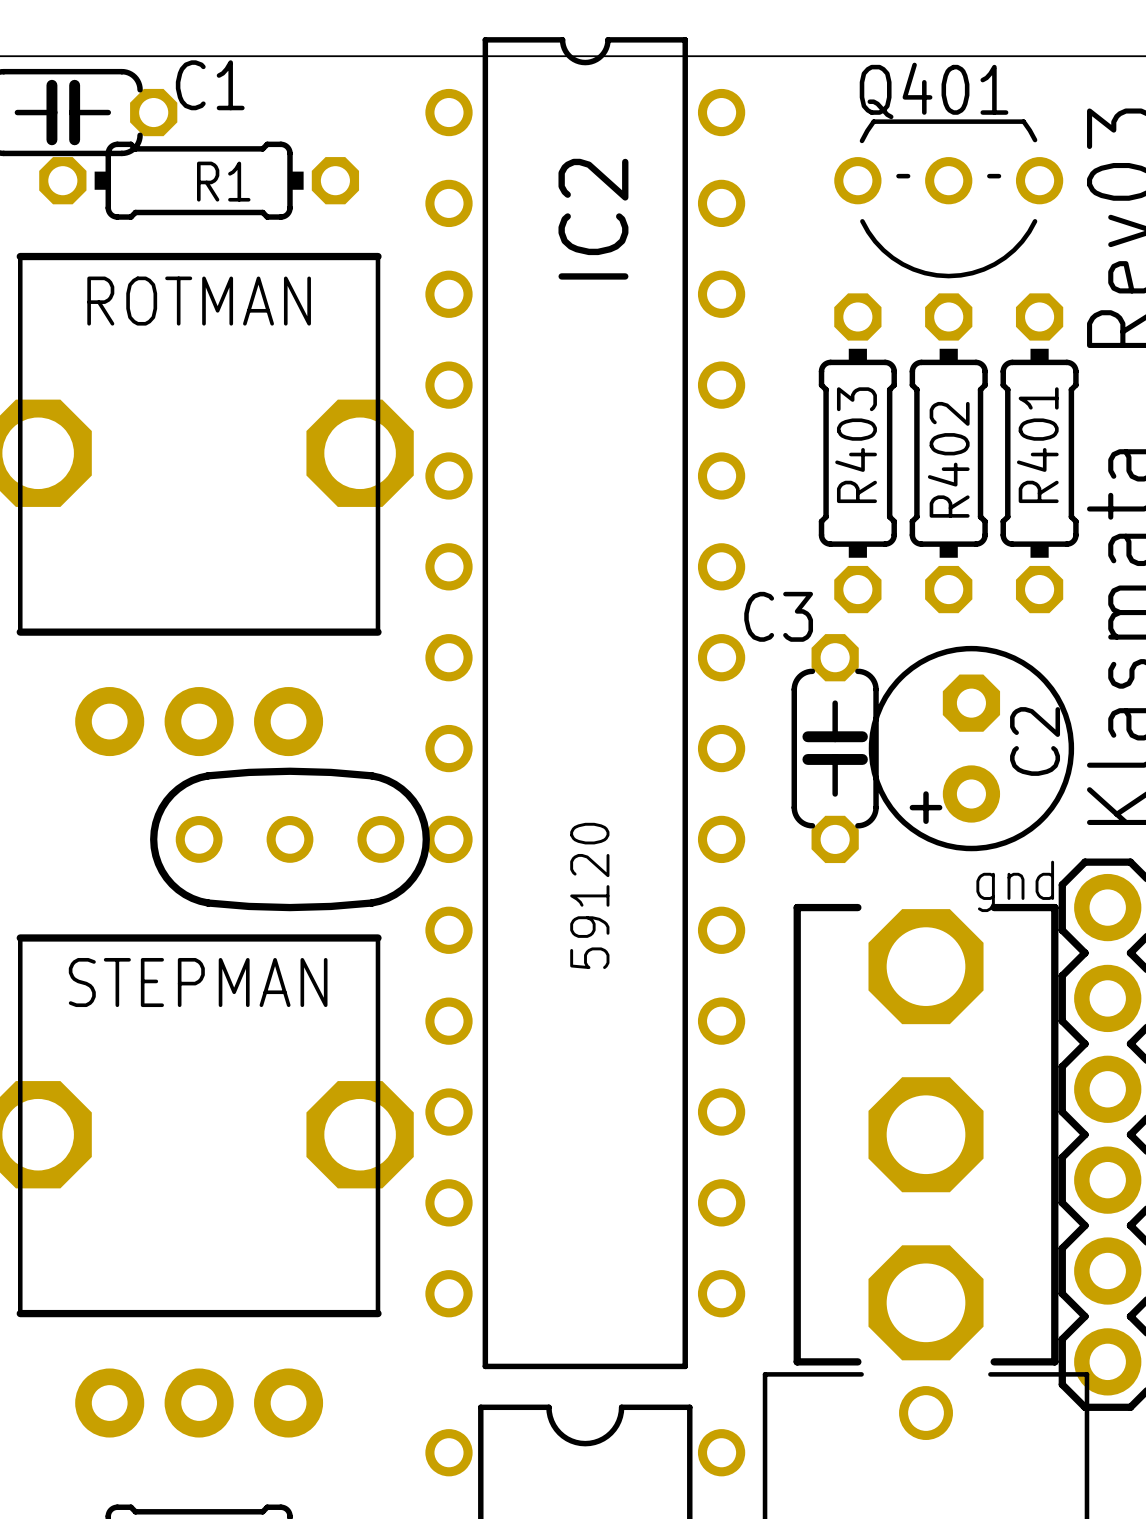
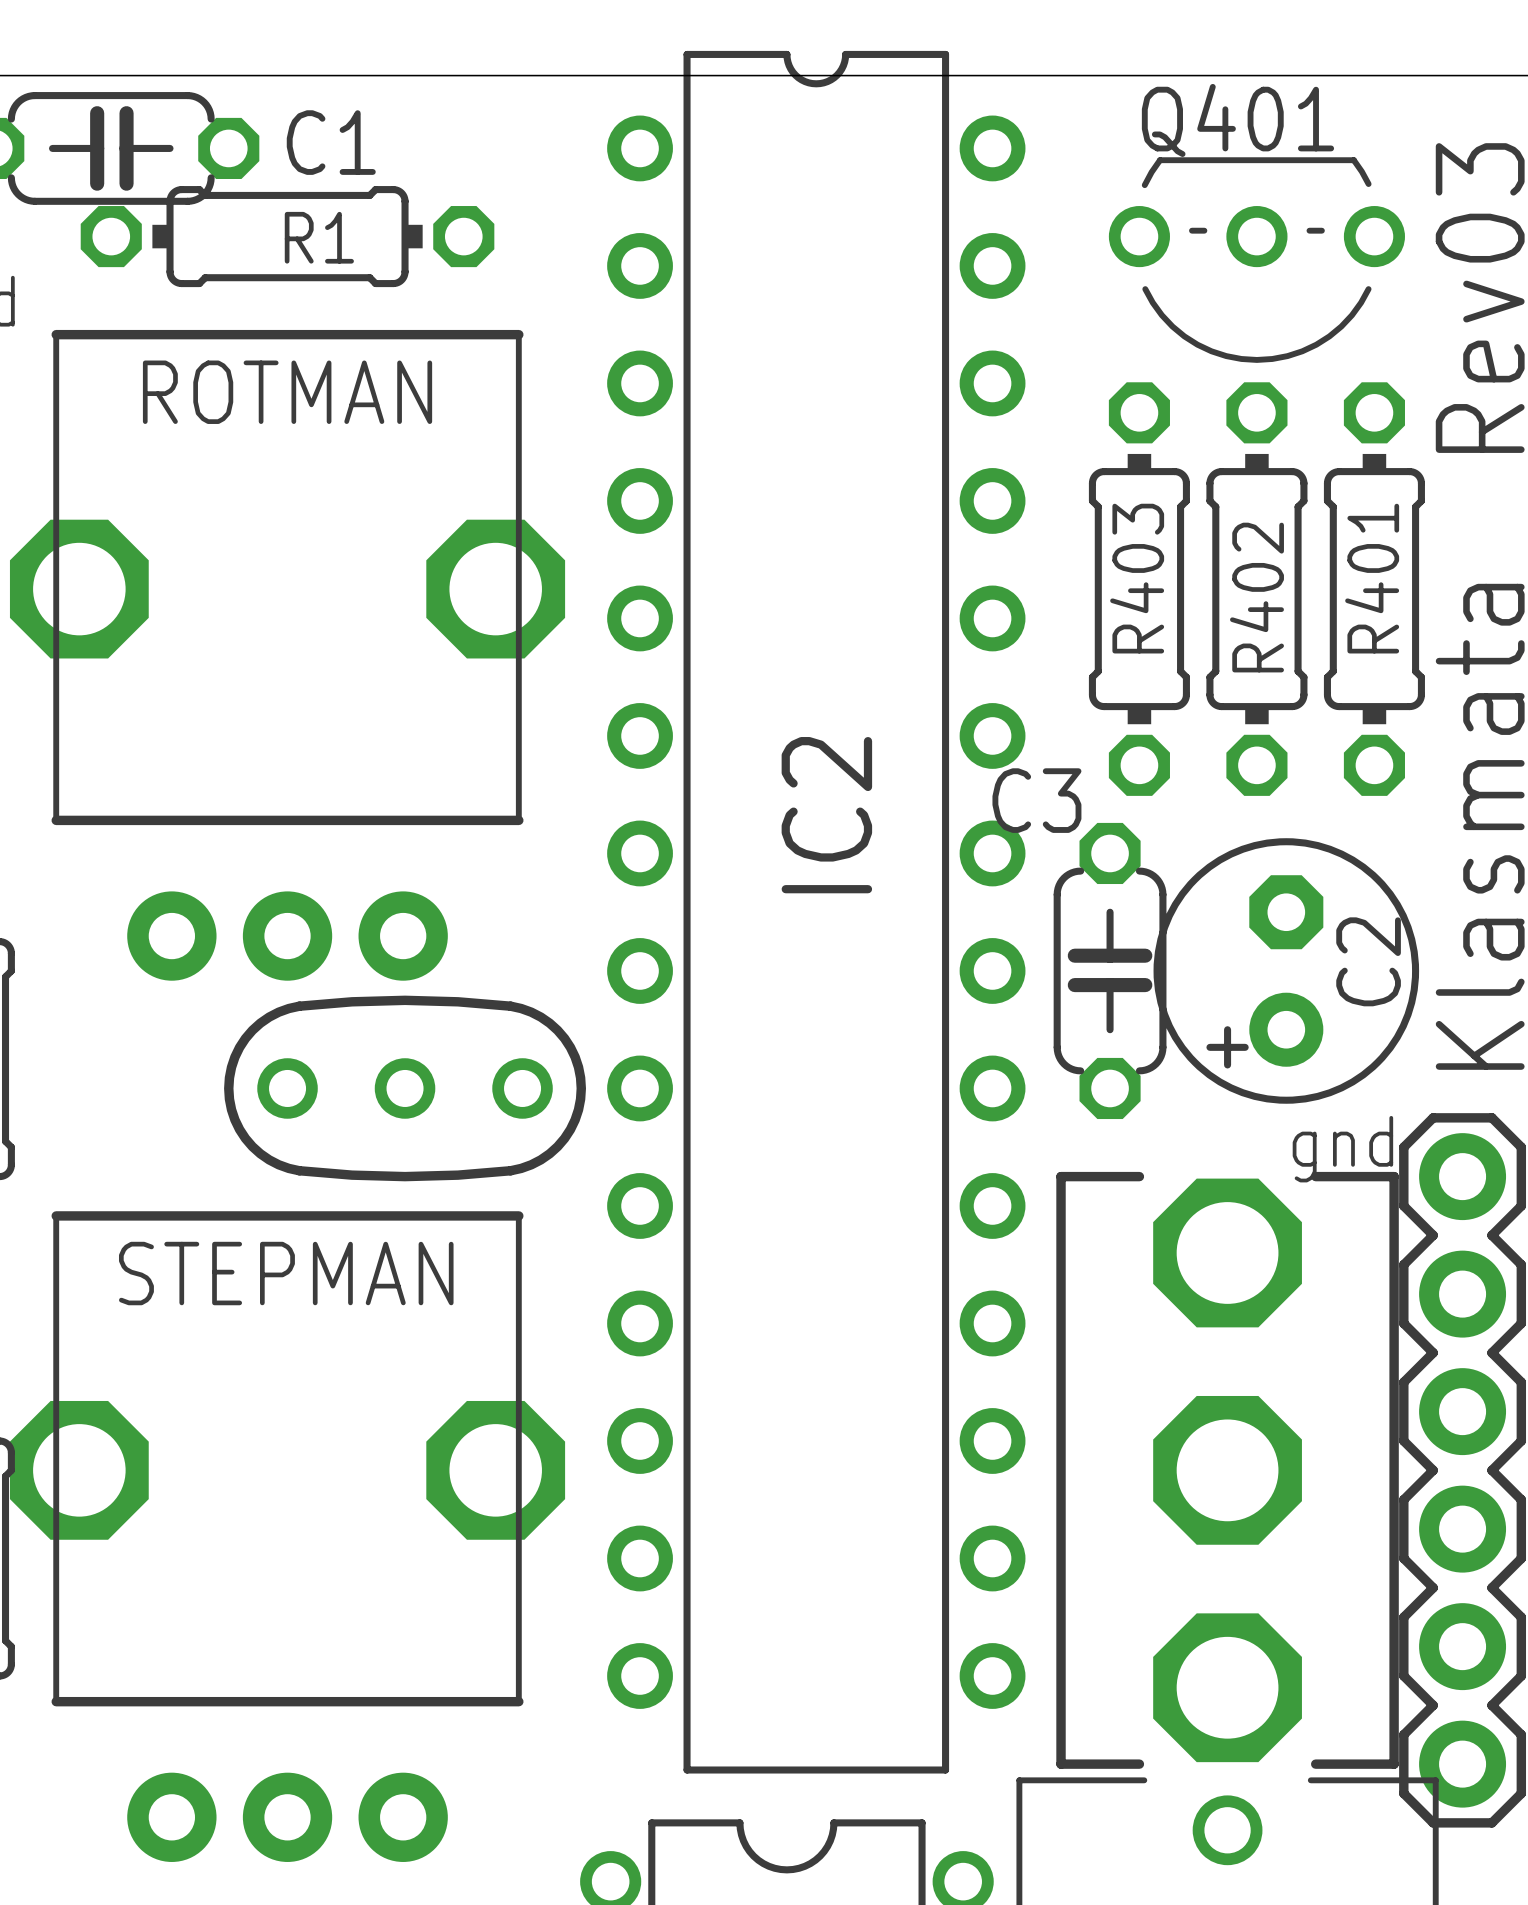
IC2 footprint: [425, 37, 746, 1370] -> [607, 50, 1026, 1774]
C1 name position: C1 (210, 85) -> C1 (331, 142)
IC2 name position: IC2 (593, 219) -> IC2 (826, 815)
text: 59120 (589, 895) -> none

